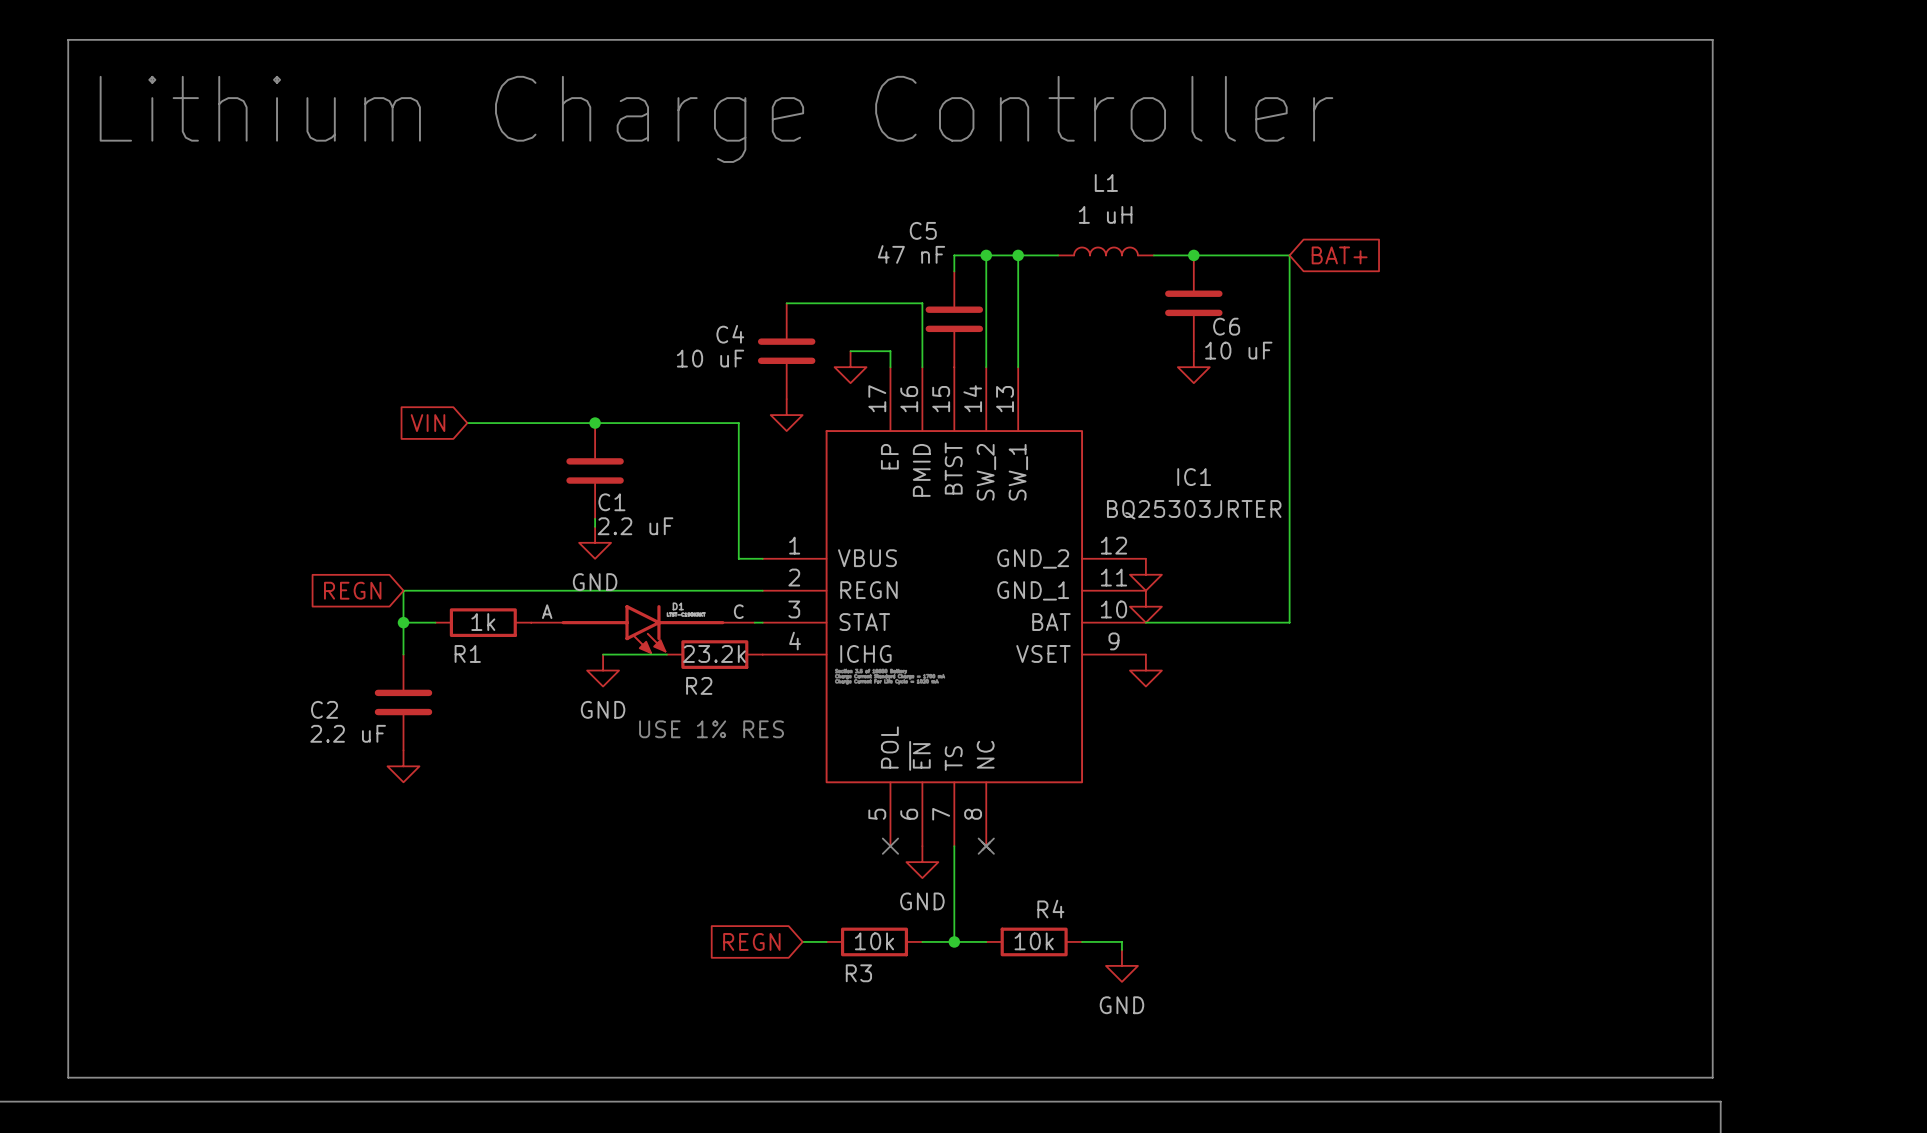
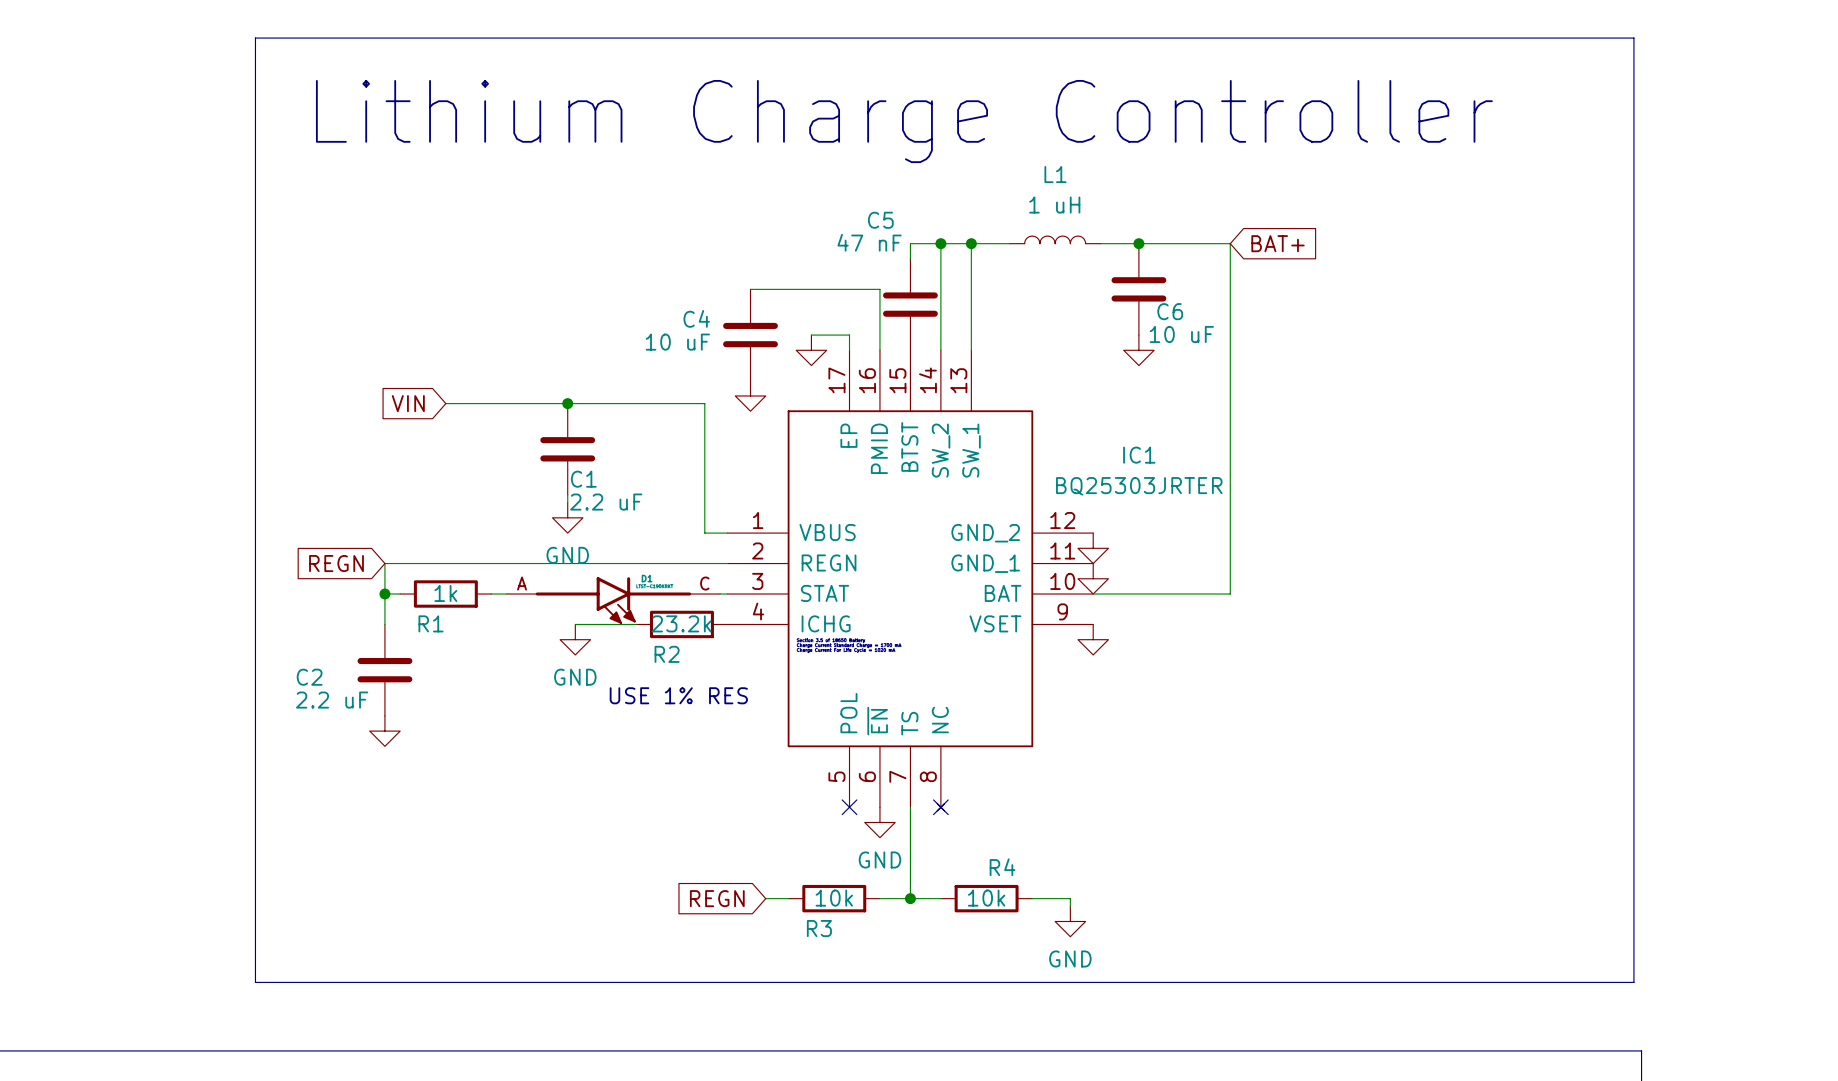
line: (267, 39) (68, 39) (68, 1077) (1712, 1077) (1712, 1029) -> (255, 38) (255, 982) (1633, 982)
text position: Lithium Charge Controller (716, 119) -> Lithium Charge Controller (904, 121)
R1 position: (483, 622) -> (445, 594)

